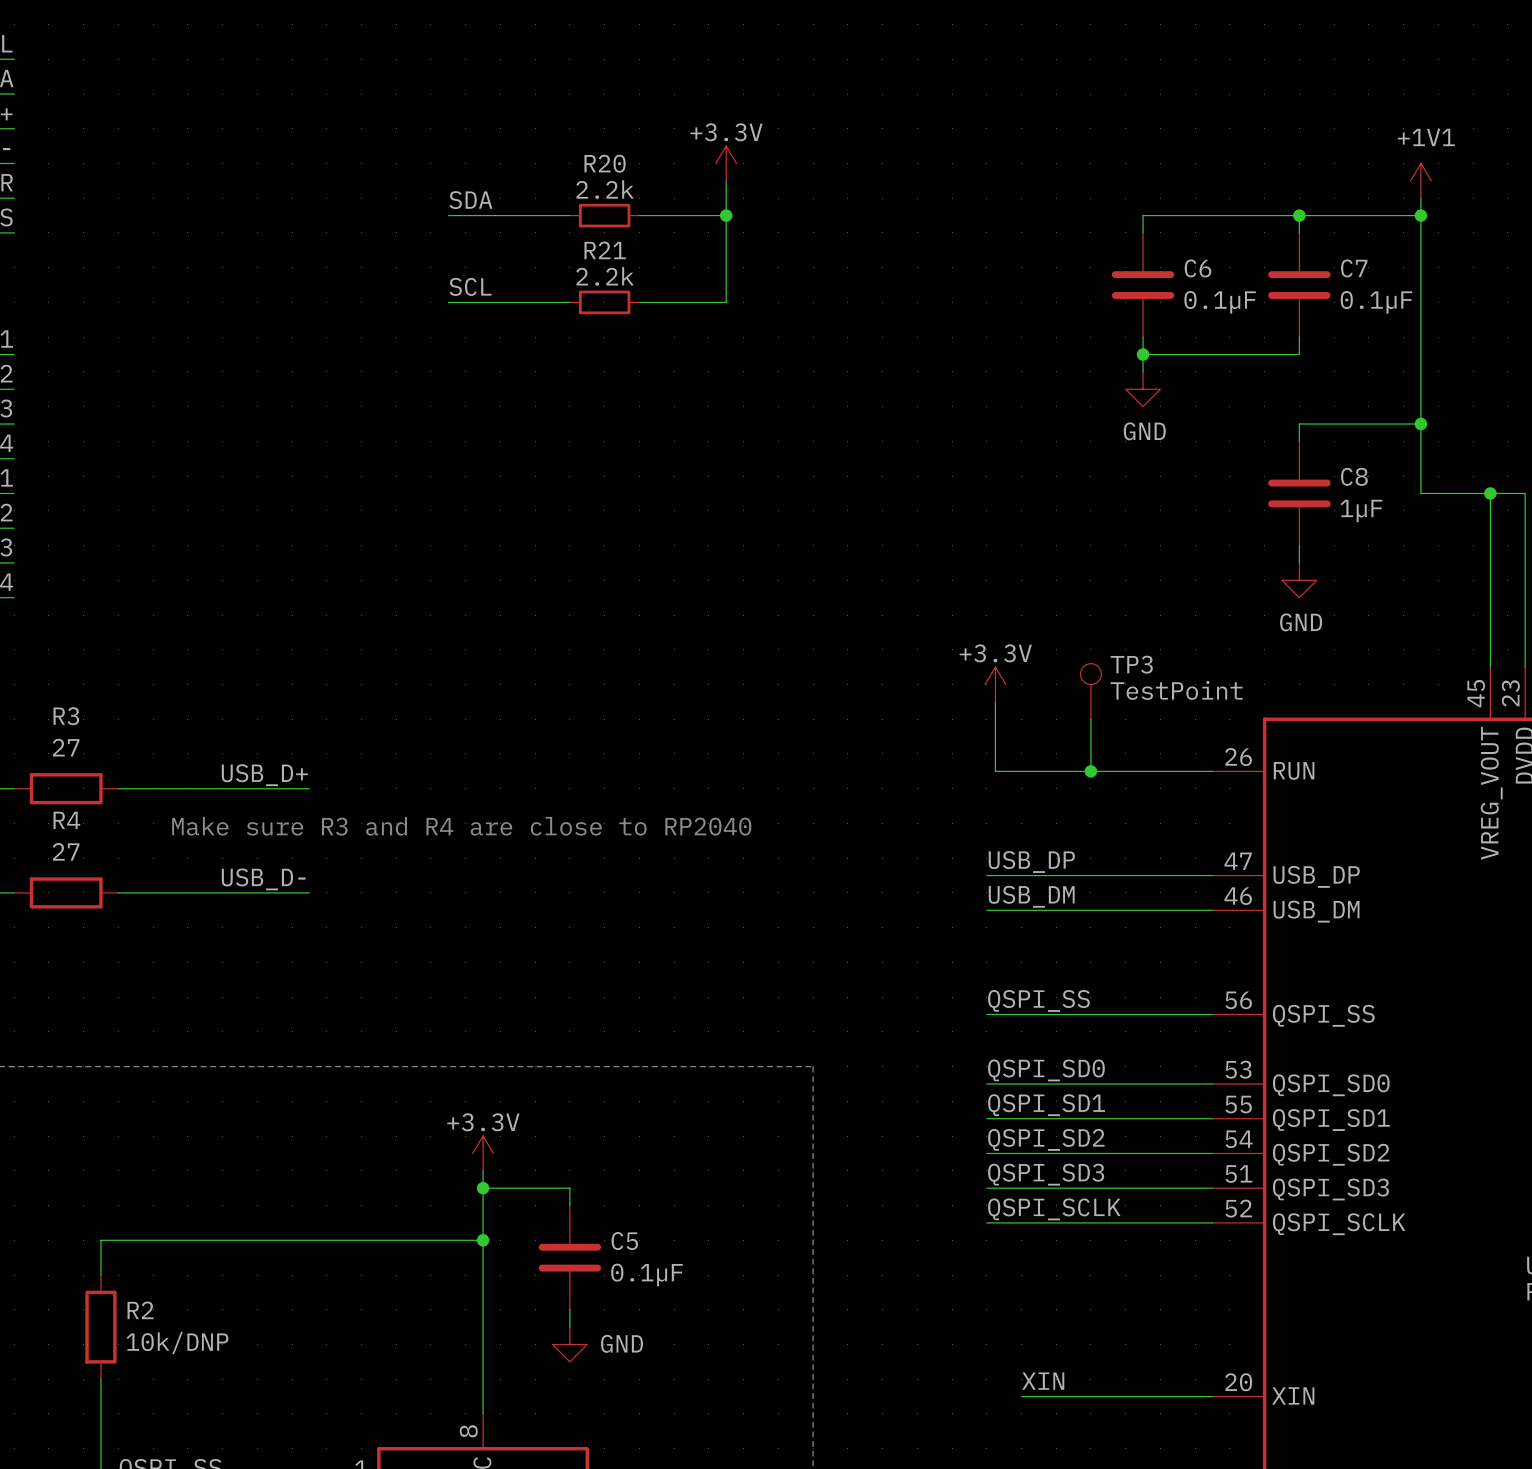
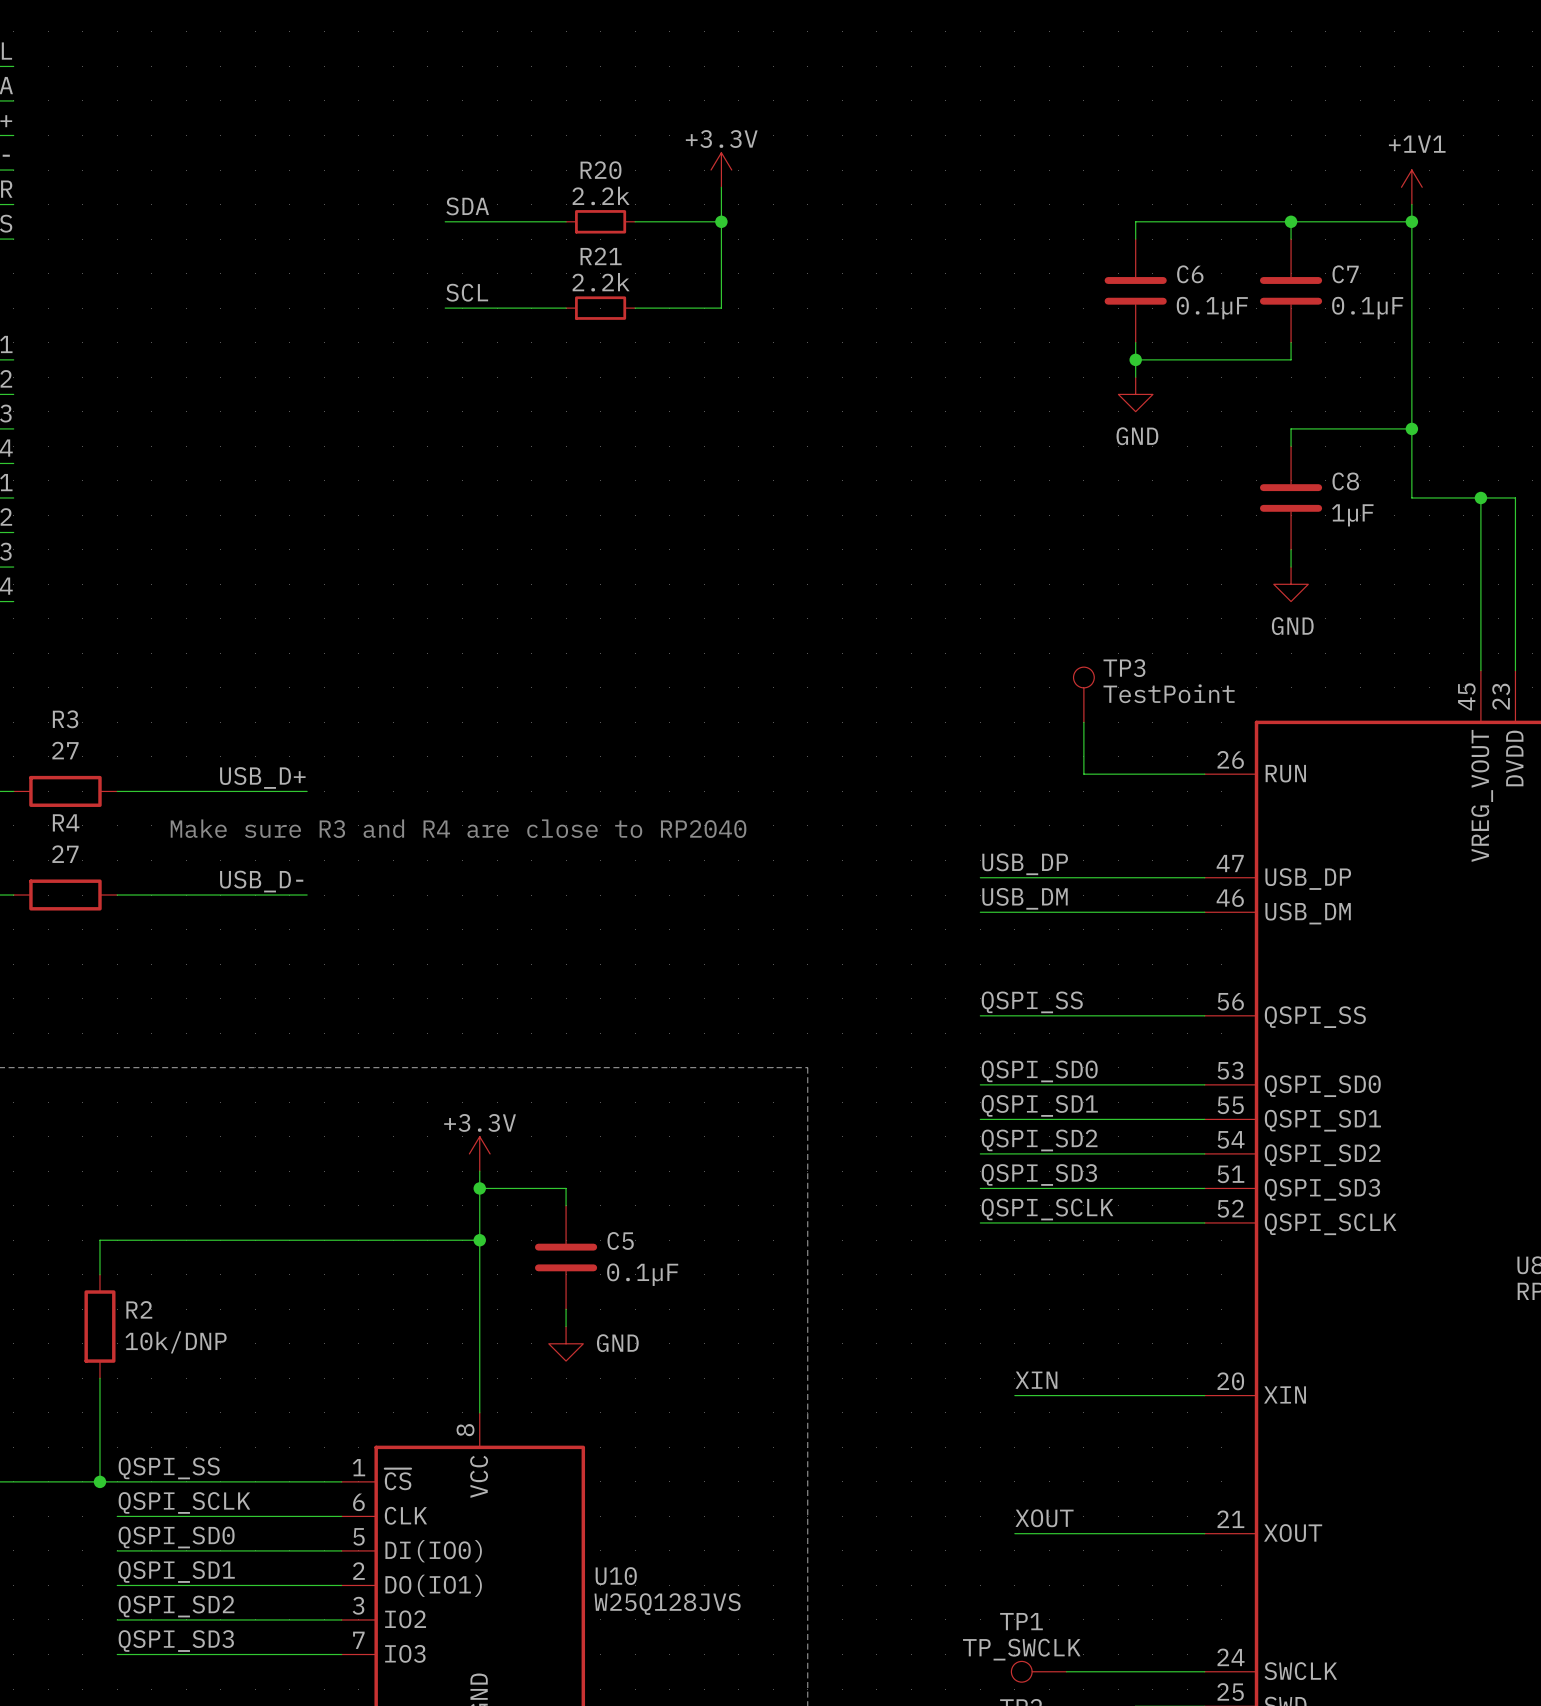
power symbol: +3.3V (995, 684) -> none
wire: (995, 701) (995, 771) (1090, 771) -> none
junction: (1090, 771) -> none

